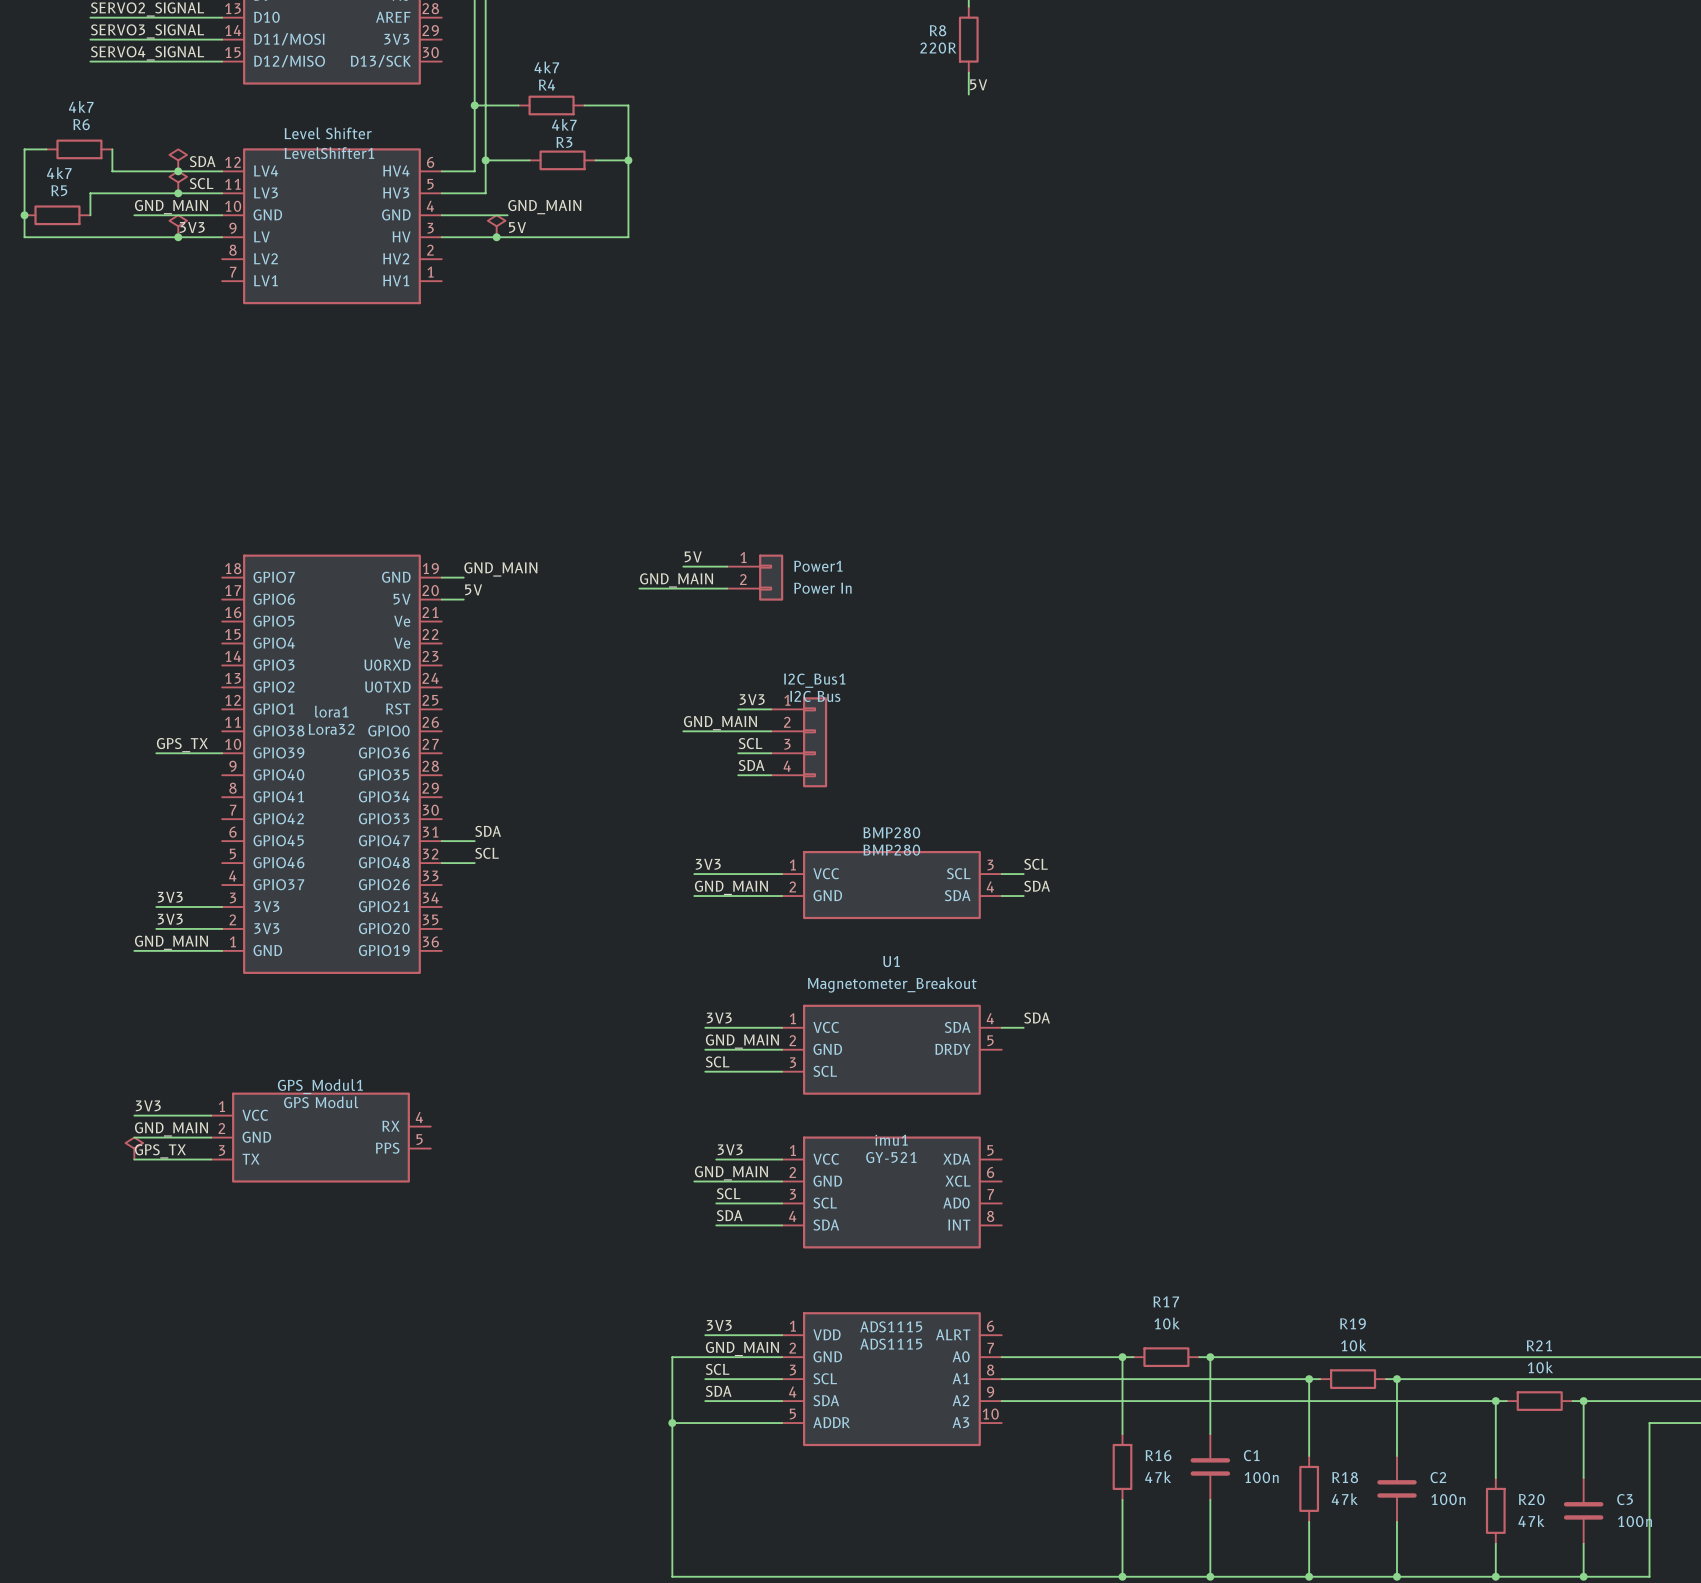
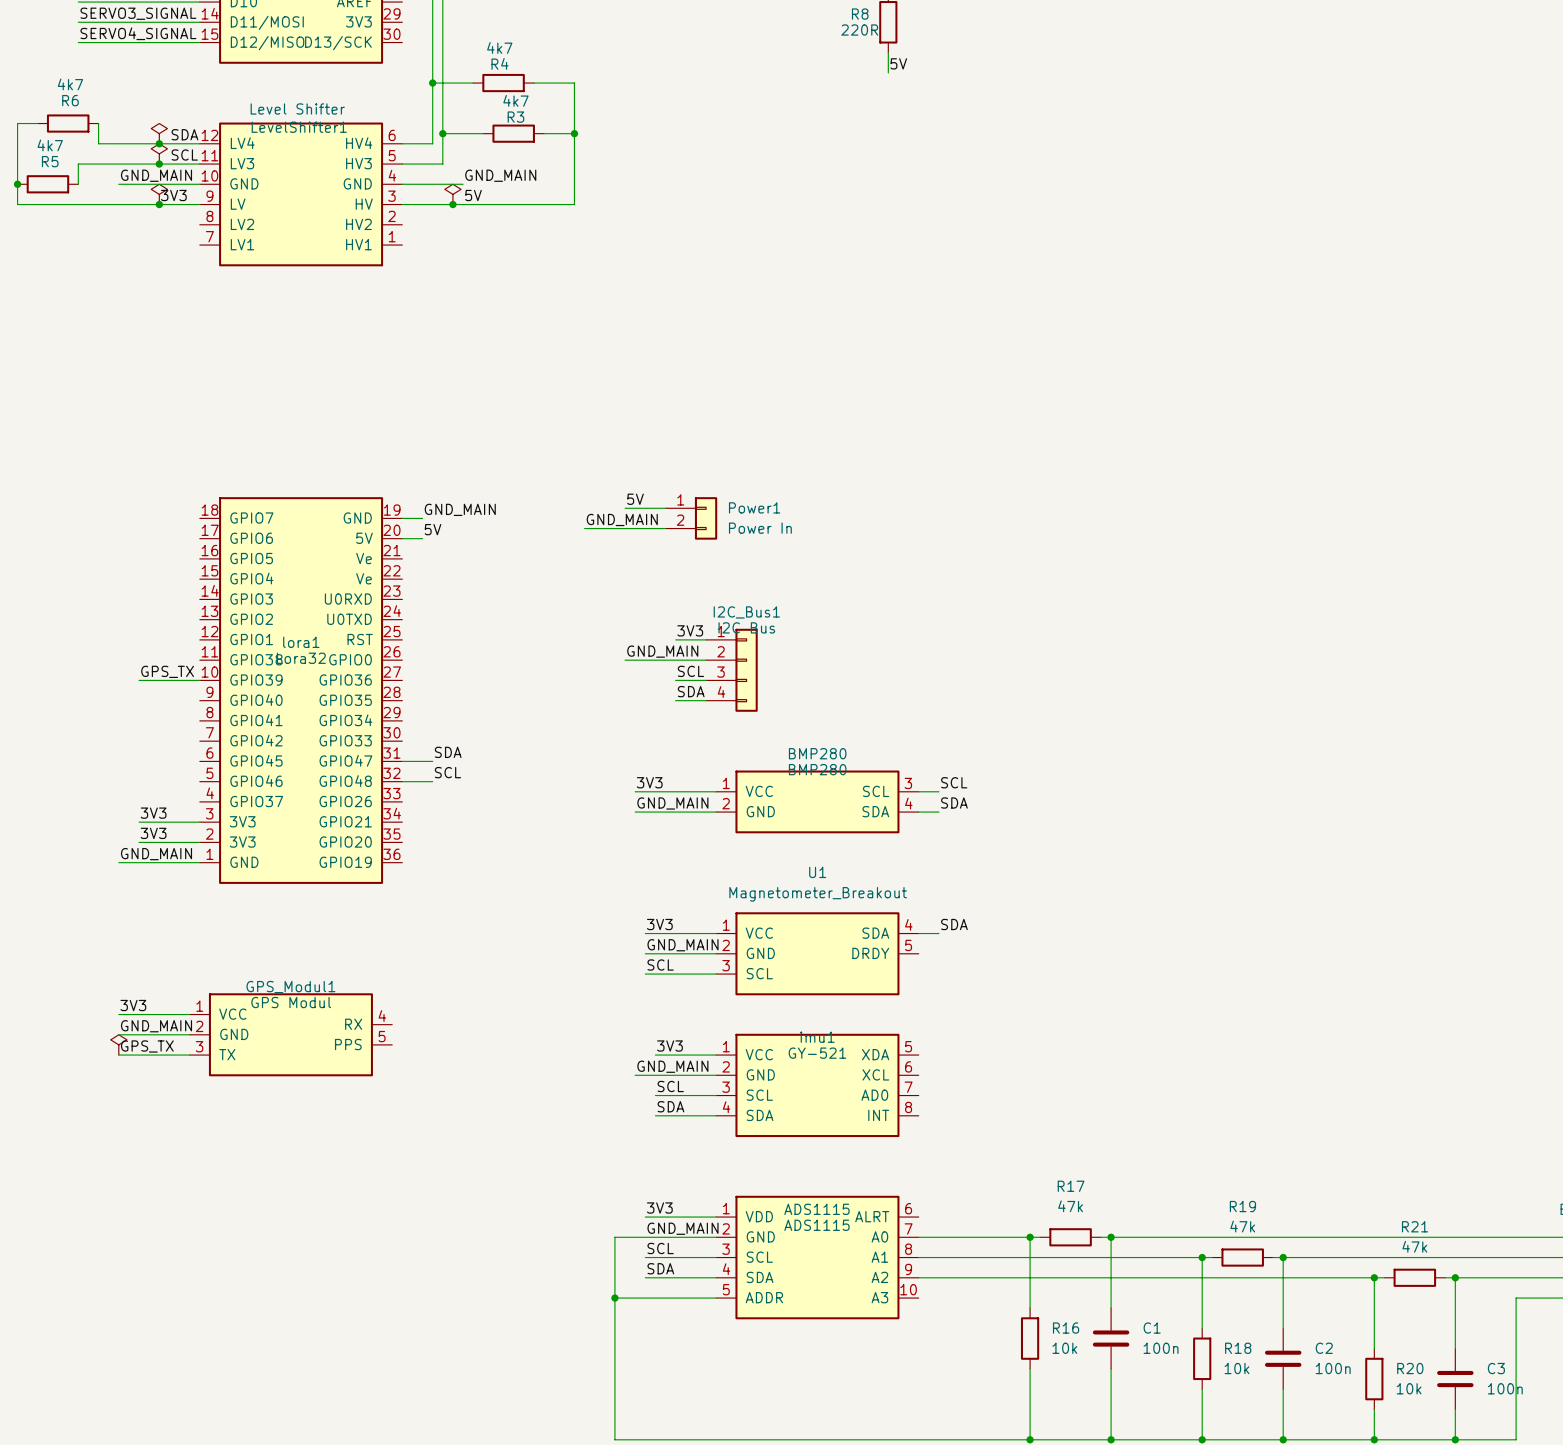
R17 value: 10k (1167, 1323) -> 47k (1070, 1206)
R19 value: 10k (1353, 1345) -> 47k (1242, 1226)
R21 value: 10k (1540, 1367) -> 47k (1414, 1246)
R16 value: 47k (1158, 1477) -> 10k (1064, 1348)
R18 value: 47k (1344, 1499) -> 10k (1236, 1368)
R20 value: 47k (1531, 1521) -> 10k (1409, 1388)

